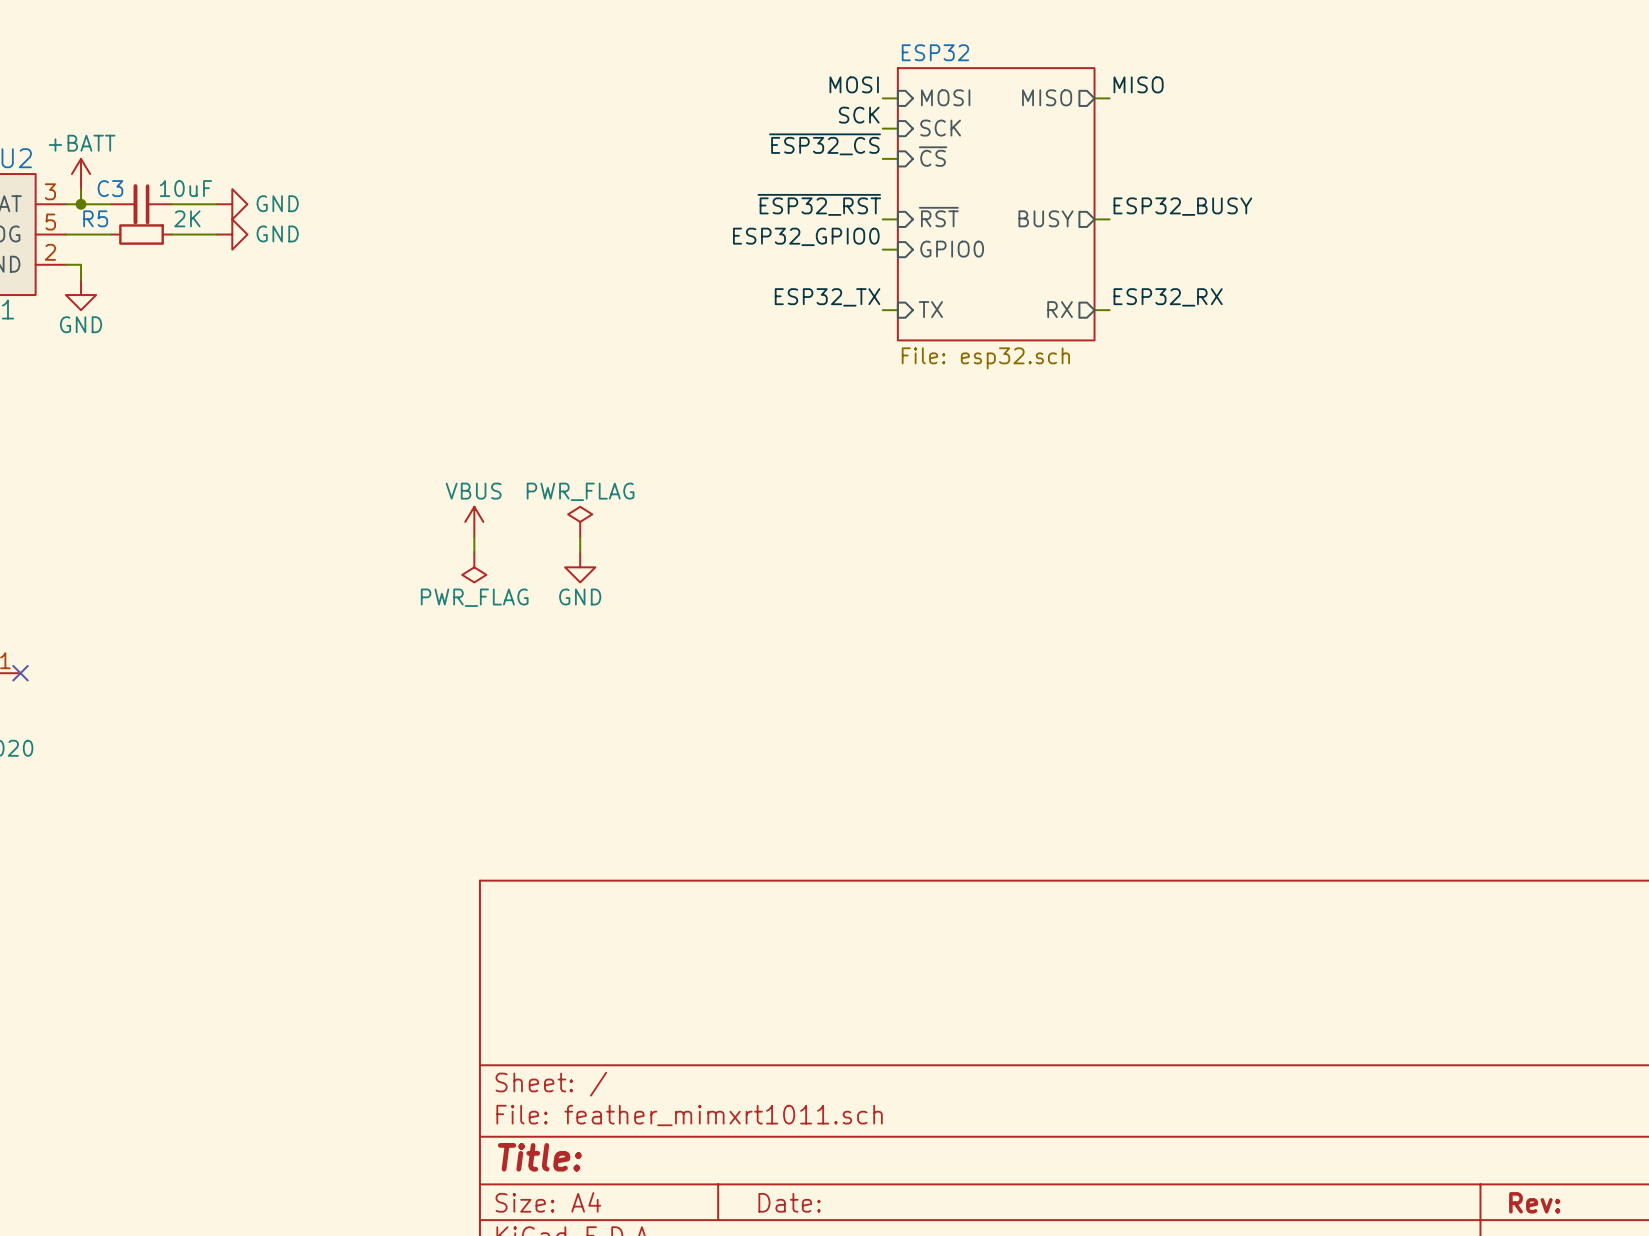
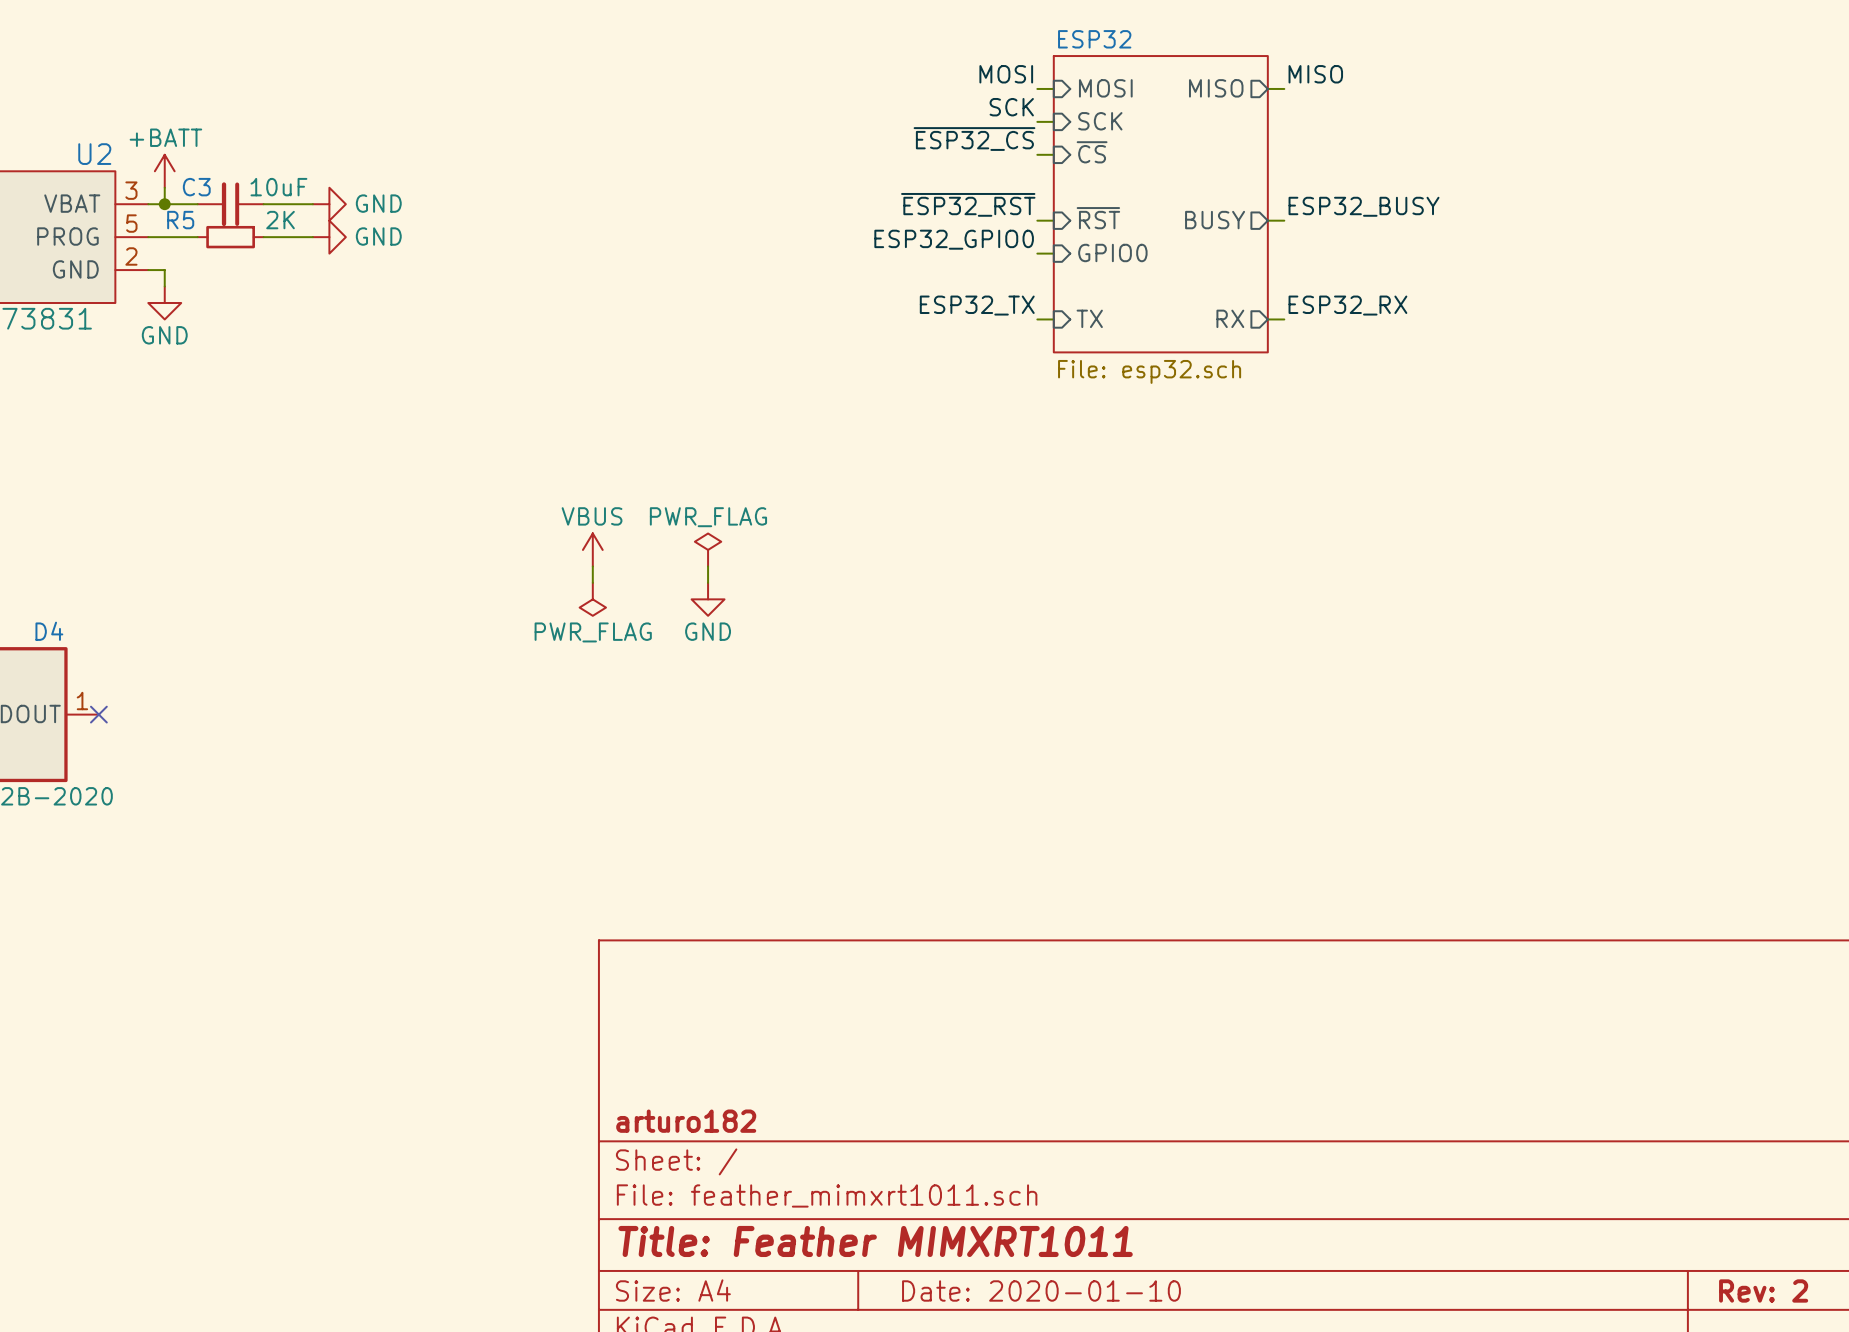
title block: none -> arturo182 (686, 1121)
title block: Title: (539, 1157) -> Title: Feather MIMXRT1011 (875, 1241)
title block: Date: (789, 1202) -> Date: 2020-01-10 (1041, 1290)
title block: Rev: (1534, 1202) -> Rev: 2 (1763, 1290)

